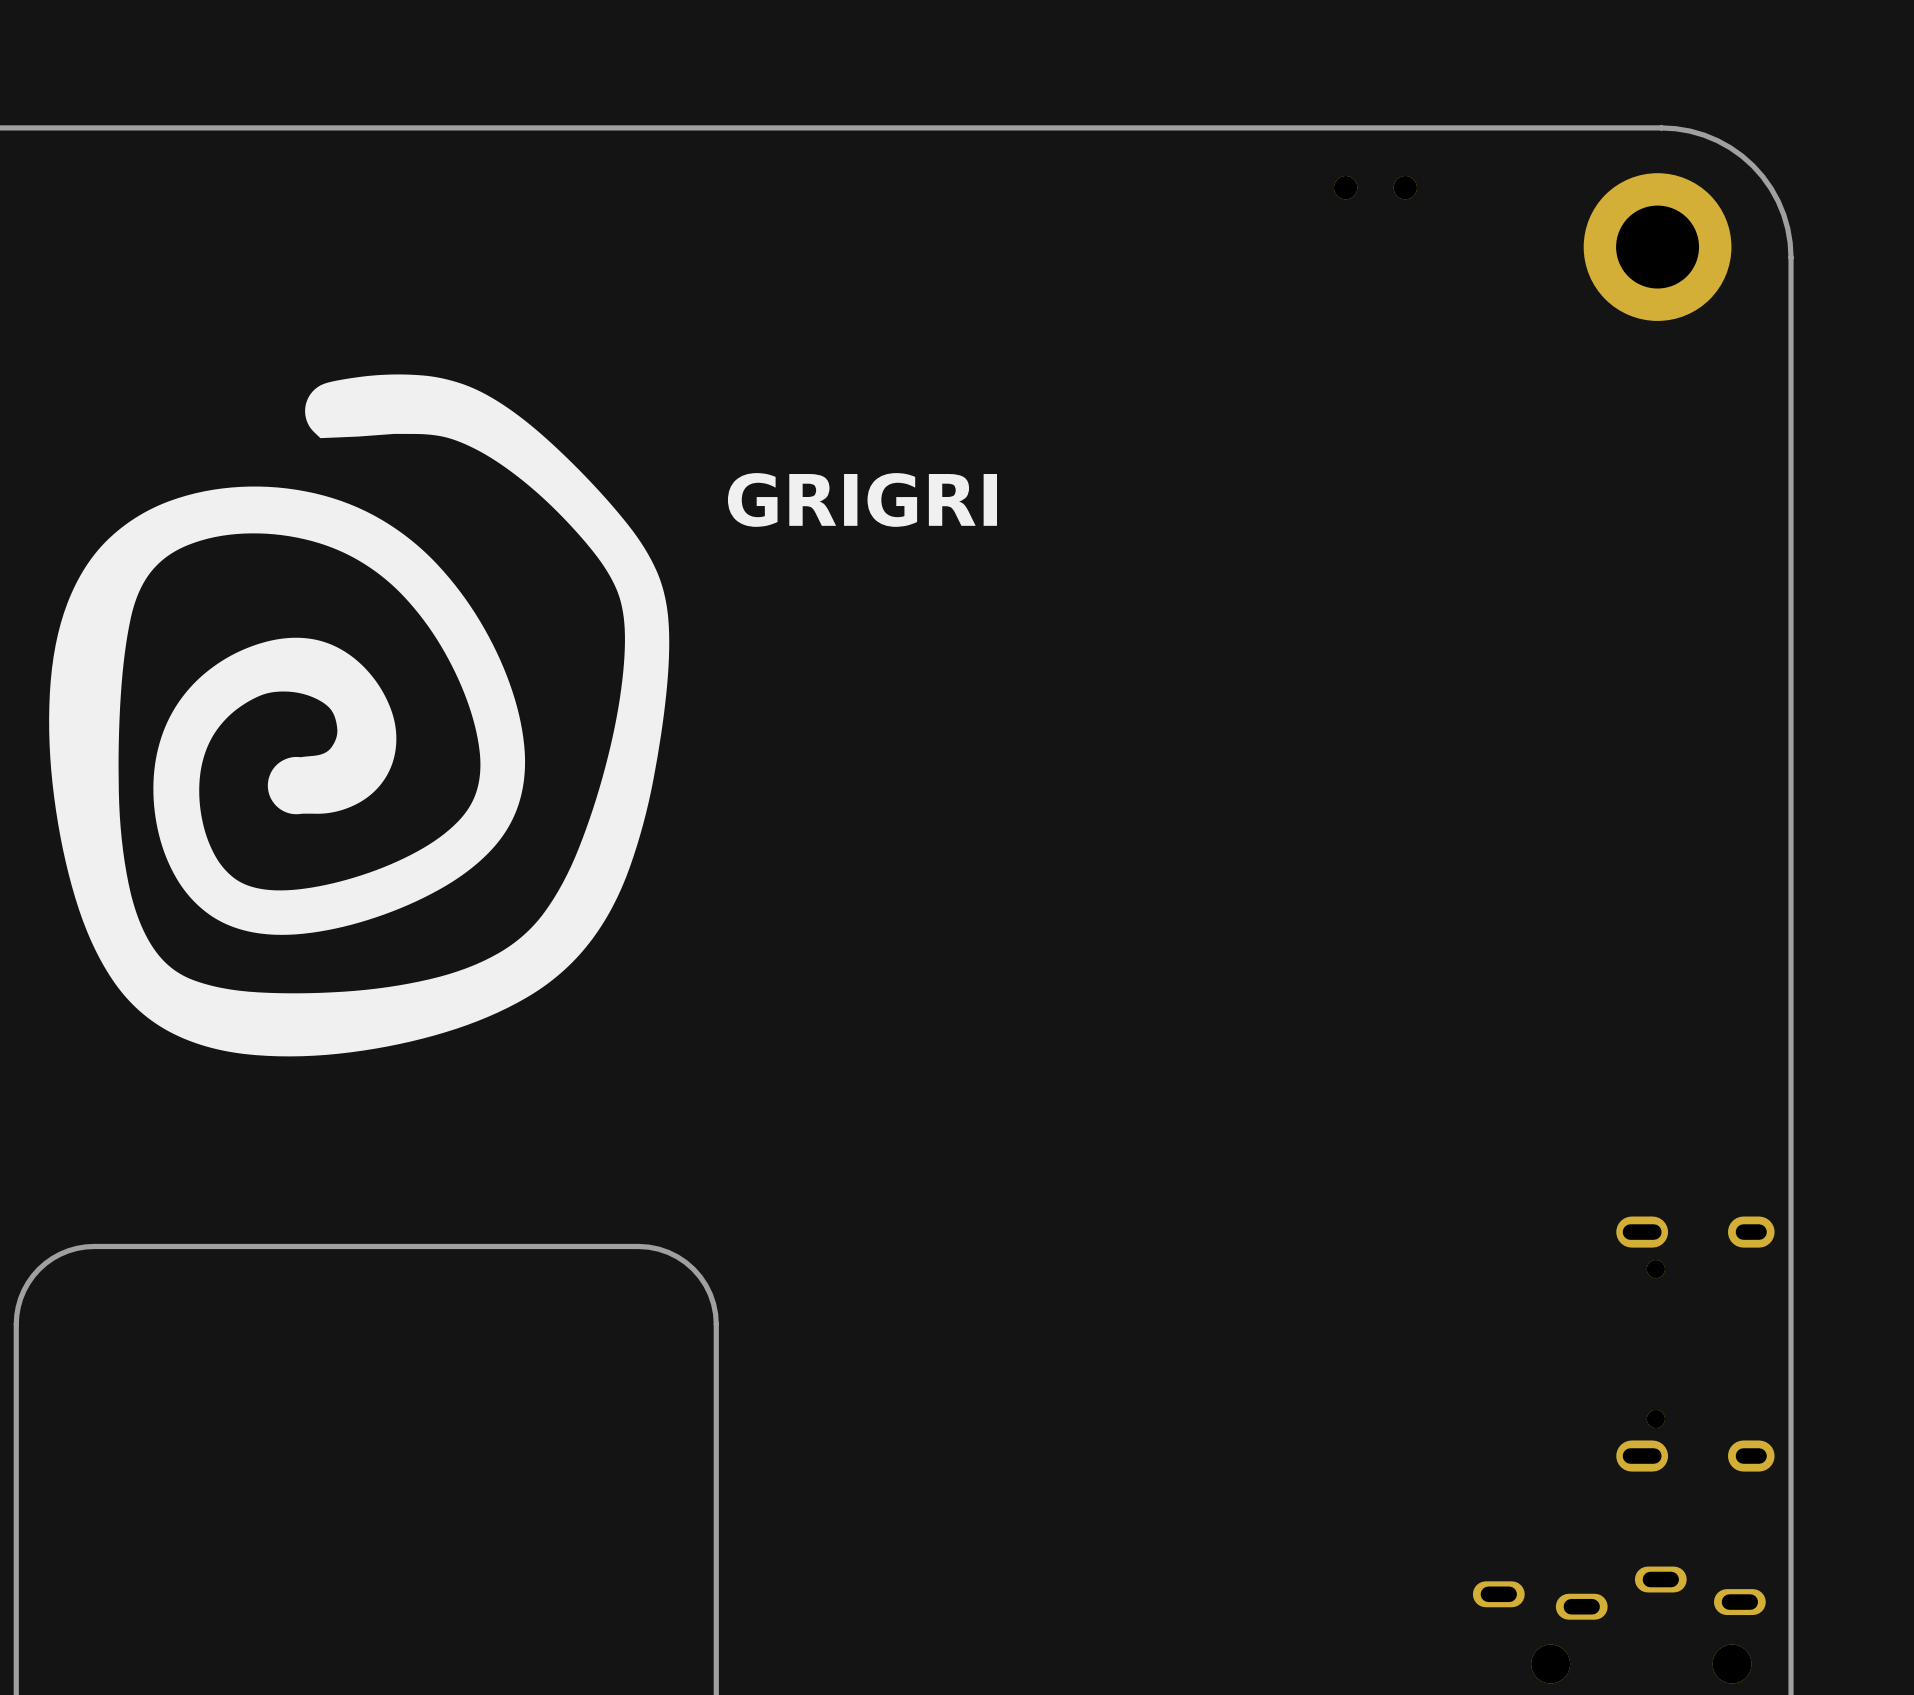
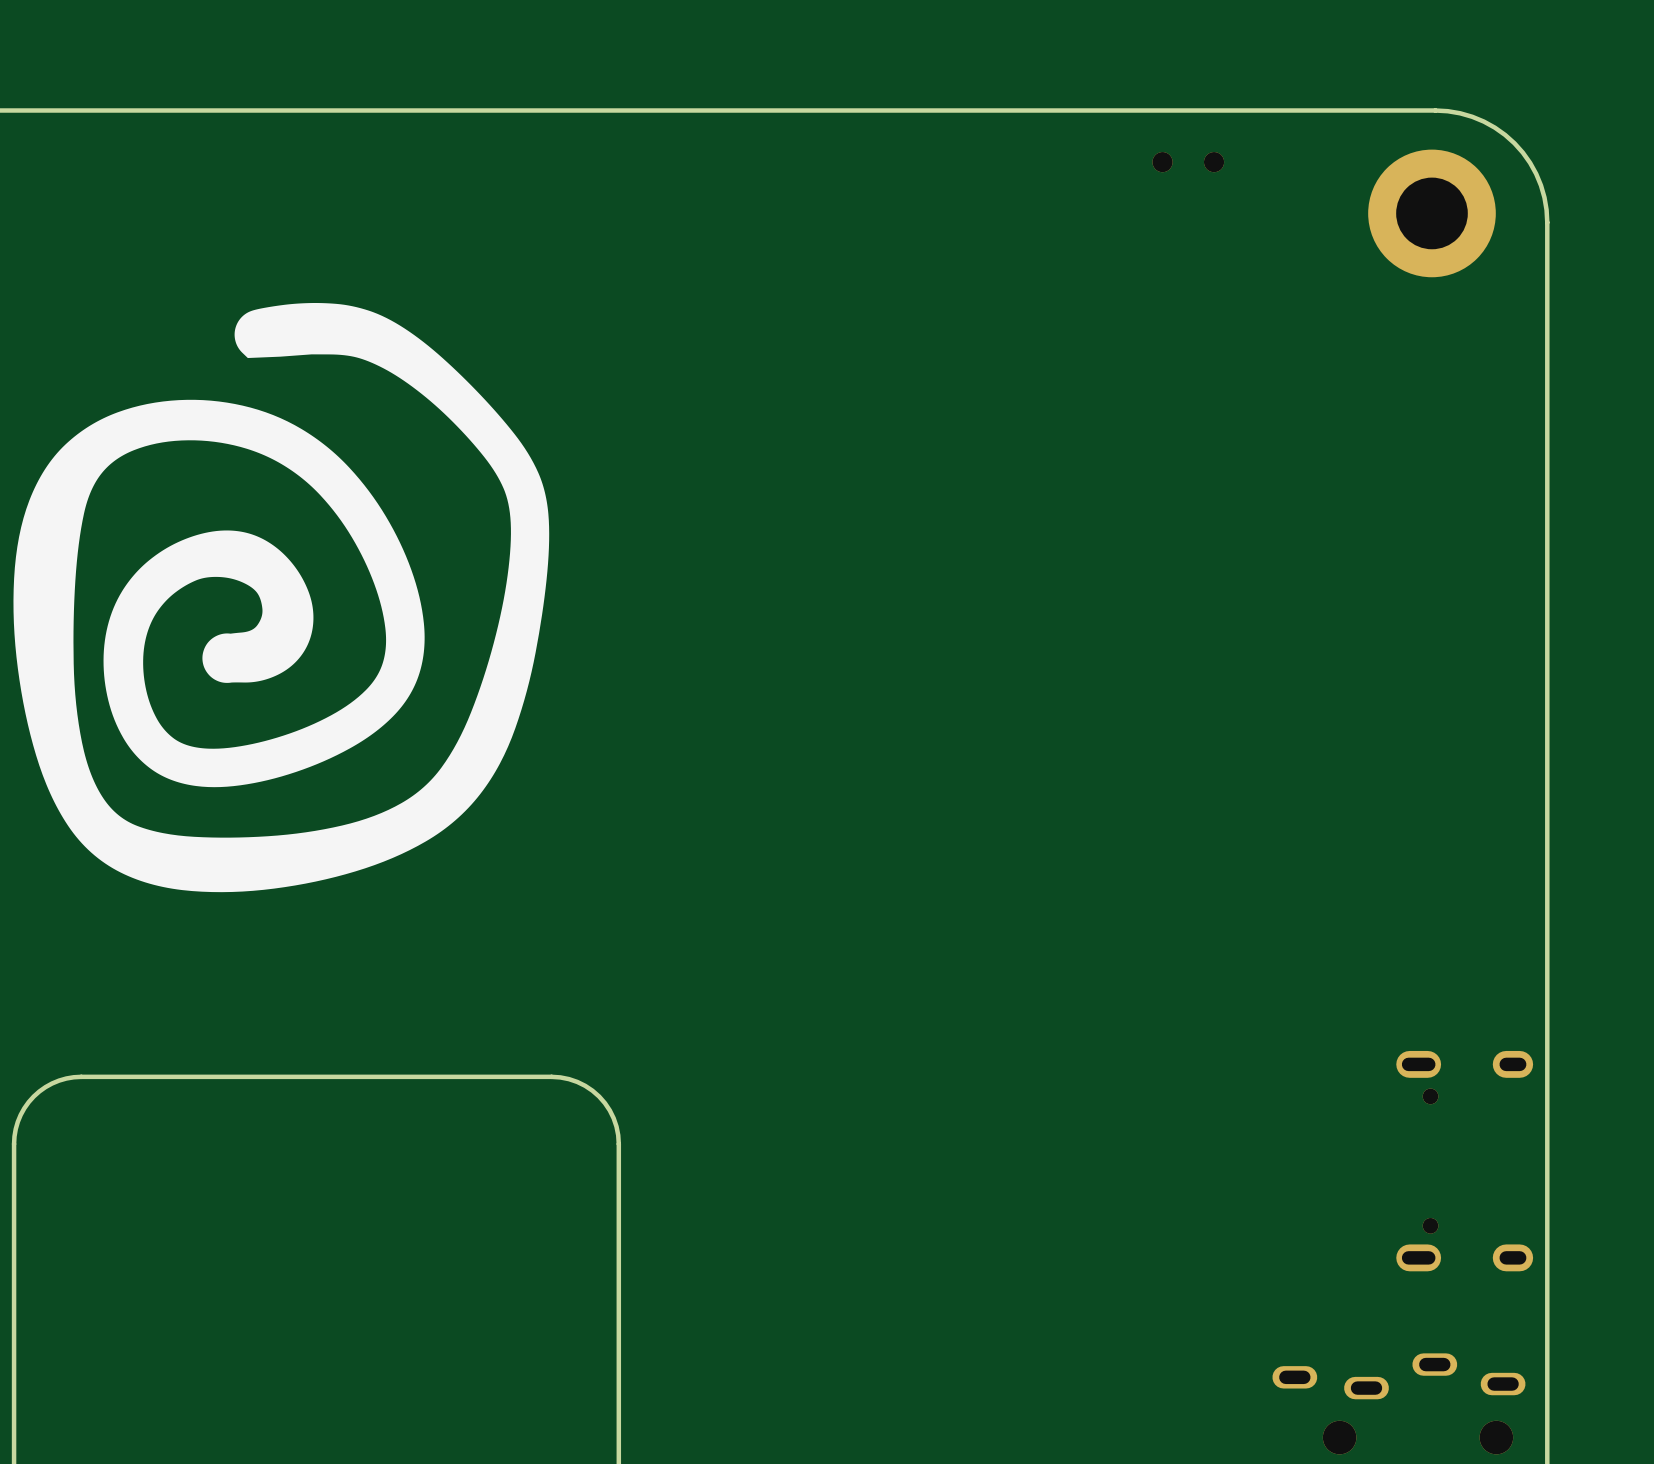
text: GRIGRI (862, 499) -> none
drawing position: (359, 715) -> (281, 597)

